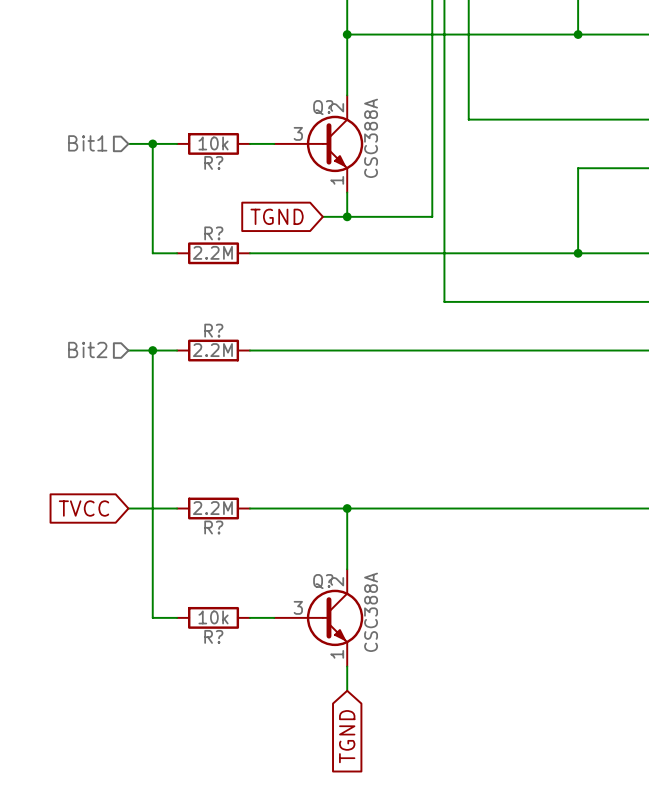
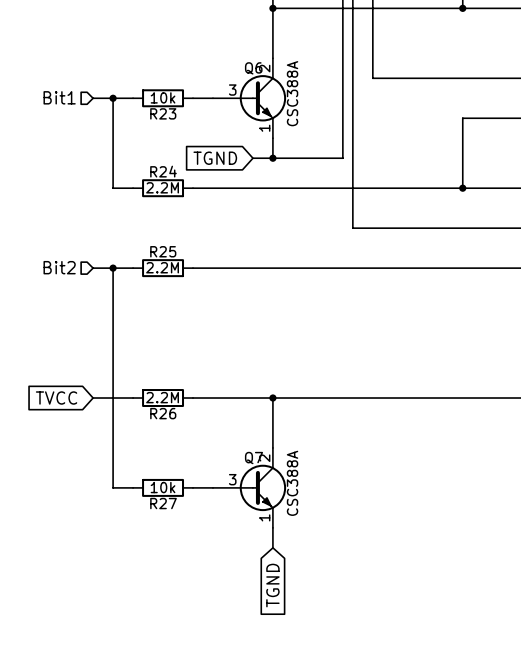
Q? name: Q? (323, 107) -> Q6 (253, 68)
R? name: R? (213, 162) -> R23 (163, 113)
R? name: R? (213, 233) -> R24 (163, 171)
R? name: R? (213, 330) -> R25 (163, 251)
R? name: R? (213, 527) -> R26 (163, 413)
Q? name: Q? (323, 581) -> Q7 (253, 458)
R? name: R? (213, 636) -> R27 (163, 503)

